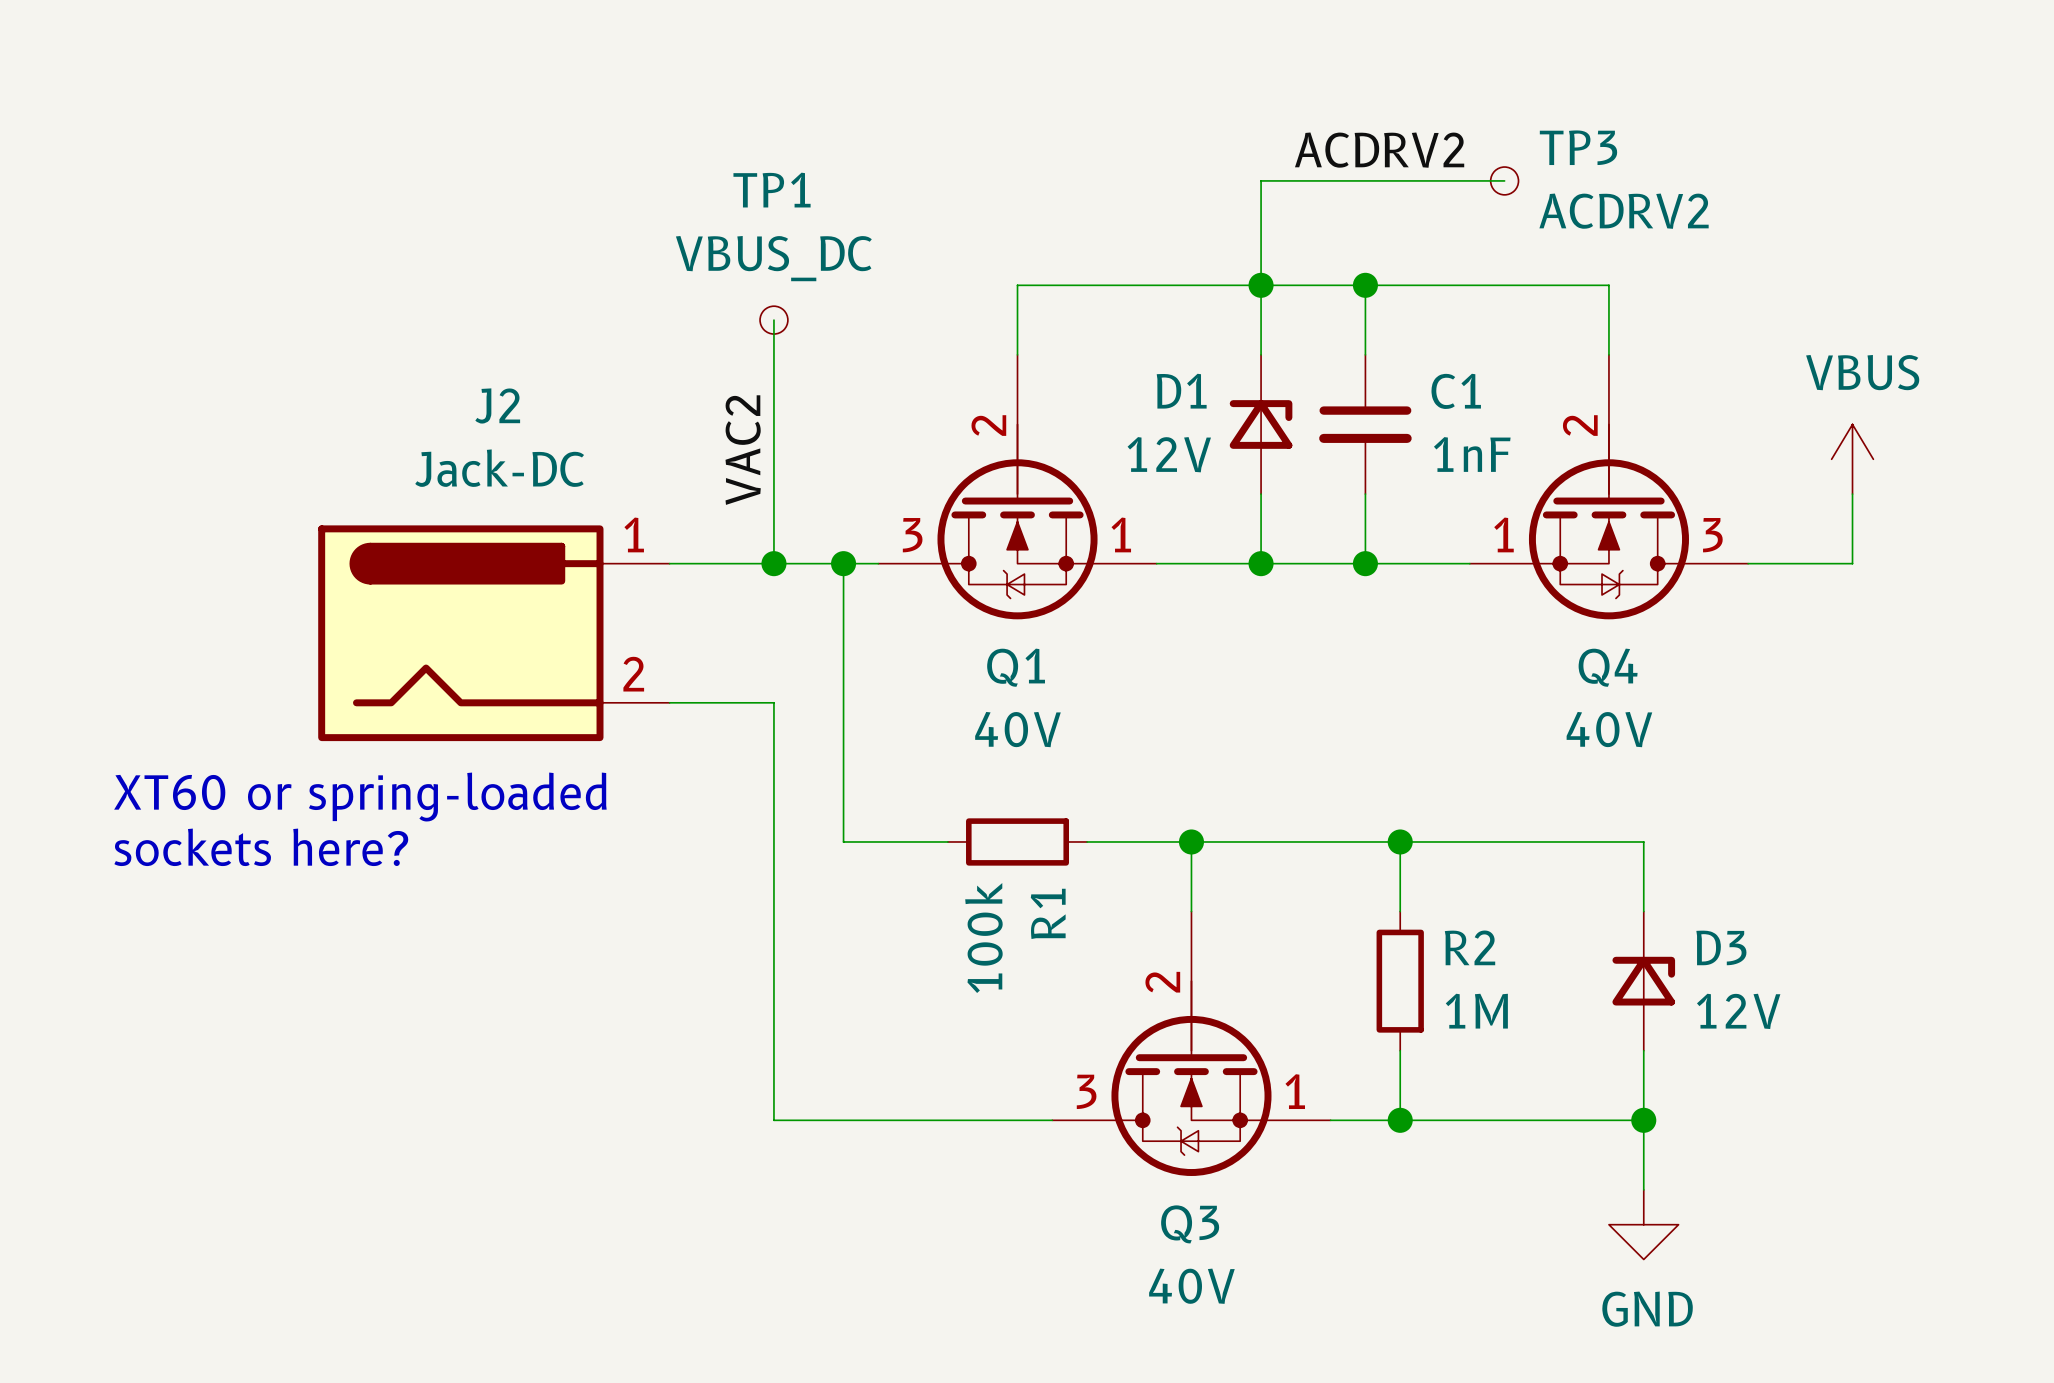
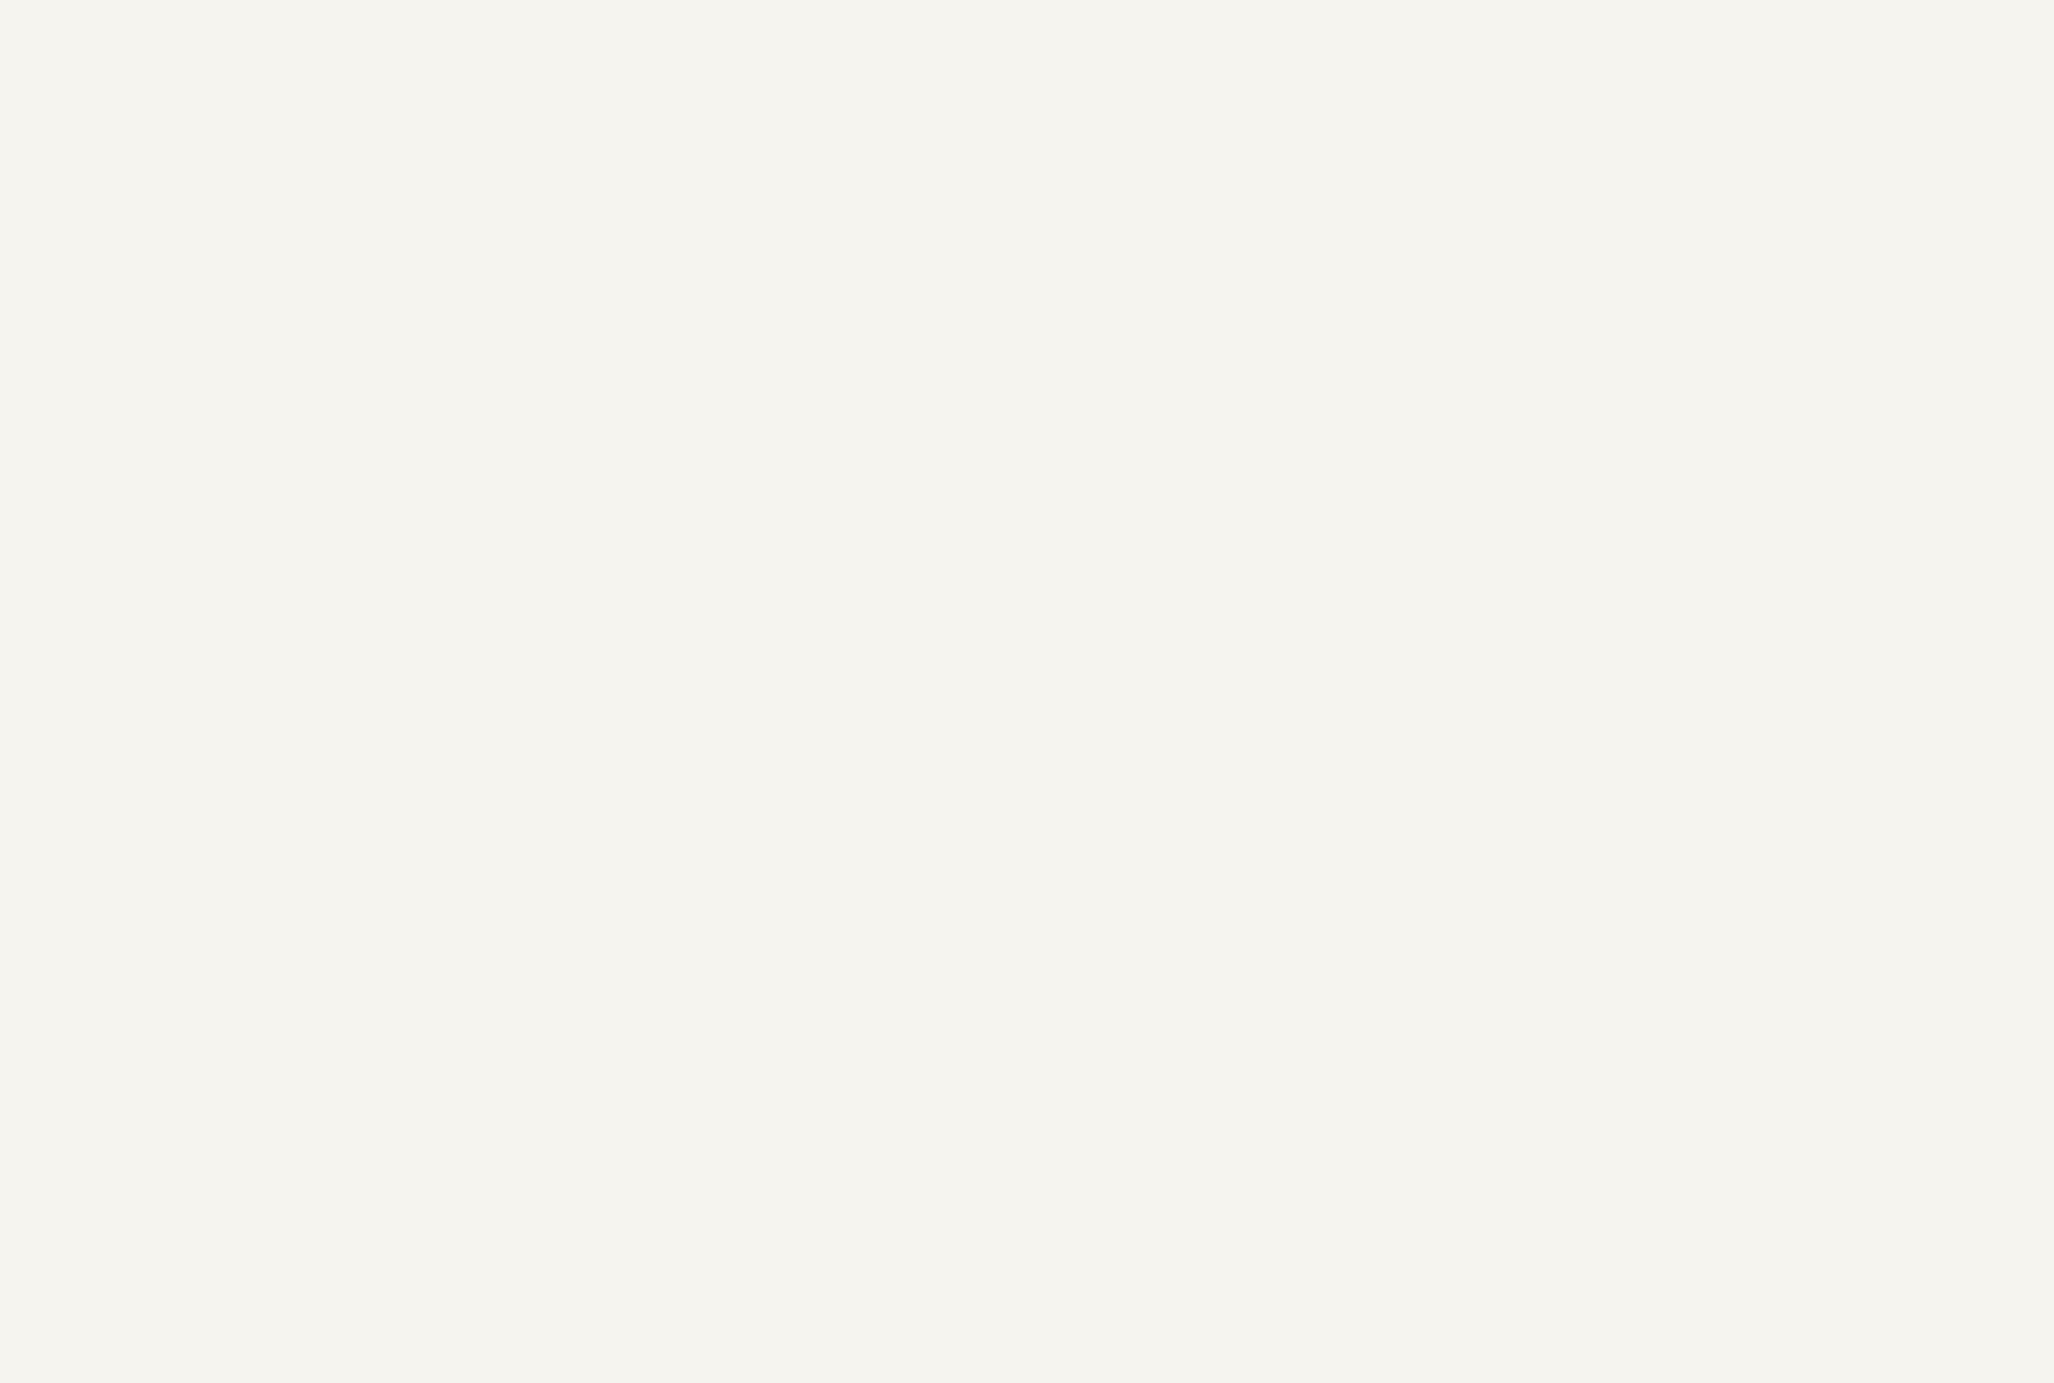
label: ACDRV2 (1379, 150) -> none
wire: (1504, 180) (1261, 180) (1261, 354) -> none
TP3: ACDRV2 (1504, 180) -> none
junction: (1261, 285) -> none
wire: (1365, 285) (1365, 354) -> none
junction: (1365, 285) -> none
wire: (773, 320) (773, 563) -> none
TP1: VBUS_DC (773, 320) -> none
wire: (1017, 354) (1017, 285) (1608, 285) (1608, 354) -> none
D1: 12V (1261, 424) -> none
C1: 1nF (1365, 424) -> none
label: VAC2 (743, 450) -> none
power symbol: VBUS (1852, 459) -> none
Q1: 40V (1017, 487) -> none
Q4: 40V (1608, 487) -> none
wire: (1261, 494) (1261, 563) -> none
wire: (1365, 494) (1365, 563) -> none
wire: (1852, 494) (1852, 563) (1748, 563) -> none
wire: (669, 563) (878, 563) -> none
junction: (773, 563) -> none
wire: (843, 563) (843, 841) (947, 841) -> none
junction: (843, 563) -> none
wire: (1156, 563) (1469, 563) -> none
junction: (1261, 563) -> none
junction: (1365, 563) -> none
J2: Jack-DC (493, 633) -> none
wire: (669, 702) (773, 702) (773, 1120) (1052, 1120) -> none
text: XT60 or spring-loaded (360, 797) -> none
R1: 100k (1017, 841) -> none
wire: (1087, 841) (1643, 841) (1643, 911) -> none
wire: (1191, 841) (1191, 911) -> none
junction: (1191, 841) -> none
wire: (1400, 841) (1400, 911) -> none
junction: (1400, 841) -> none
text: sockets here? (261, 847) -> none
R2: 1M (1400, 981) -> none
D3: 12V (1643, 981) -> none
Q3: 40V (1191, 1043) -> none
wire: (1400, 1050) (1400, 1120) -> none
wire: (1643, 1050) (1643, 1189) -> none
wire: (1330, 1120) (1643, 1120) -> none
junction: (1400, 1120) -> none
junction: (1643, 1120) -> none
power symbol: GND (1643, 1224) -> none

